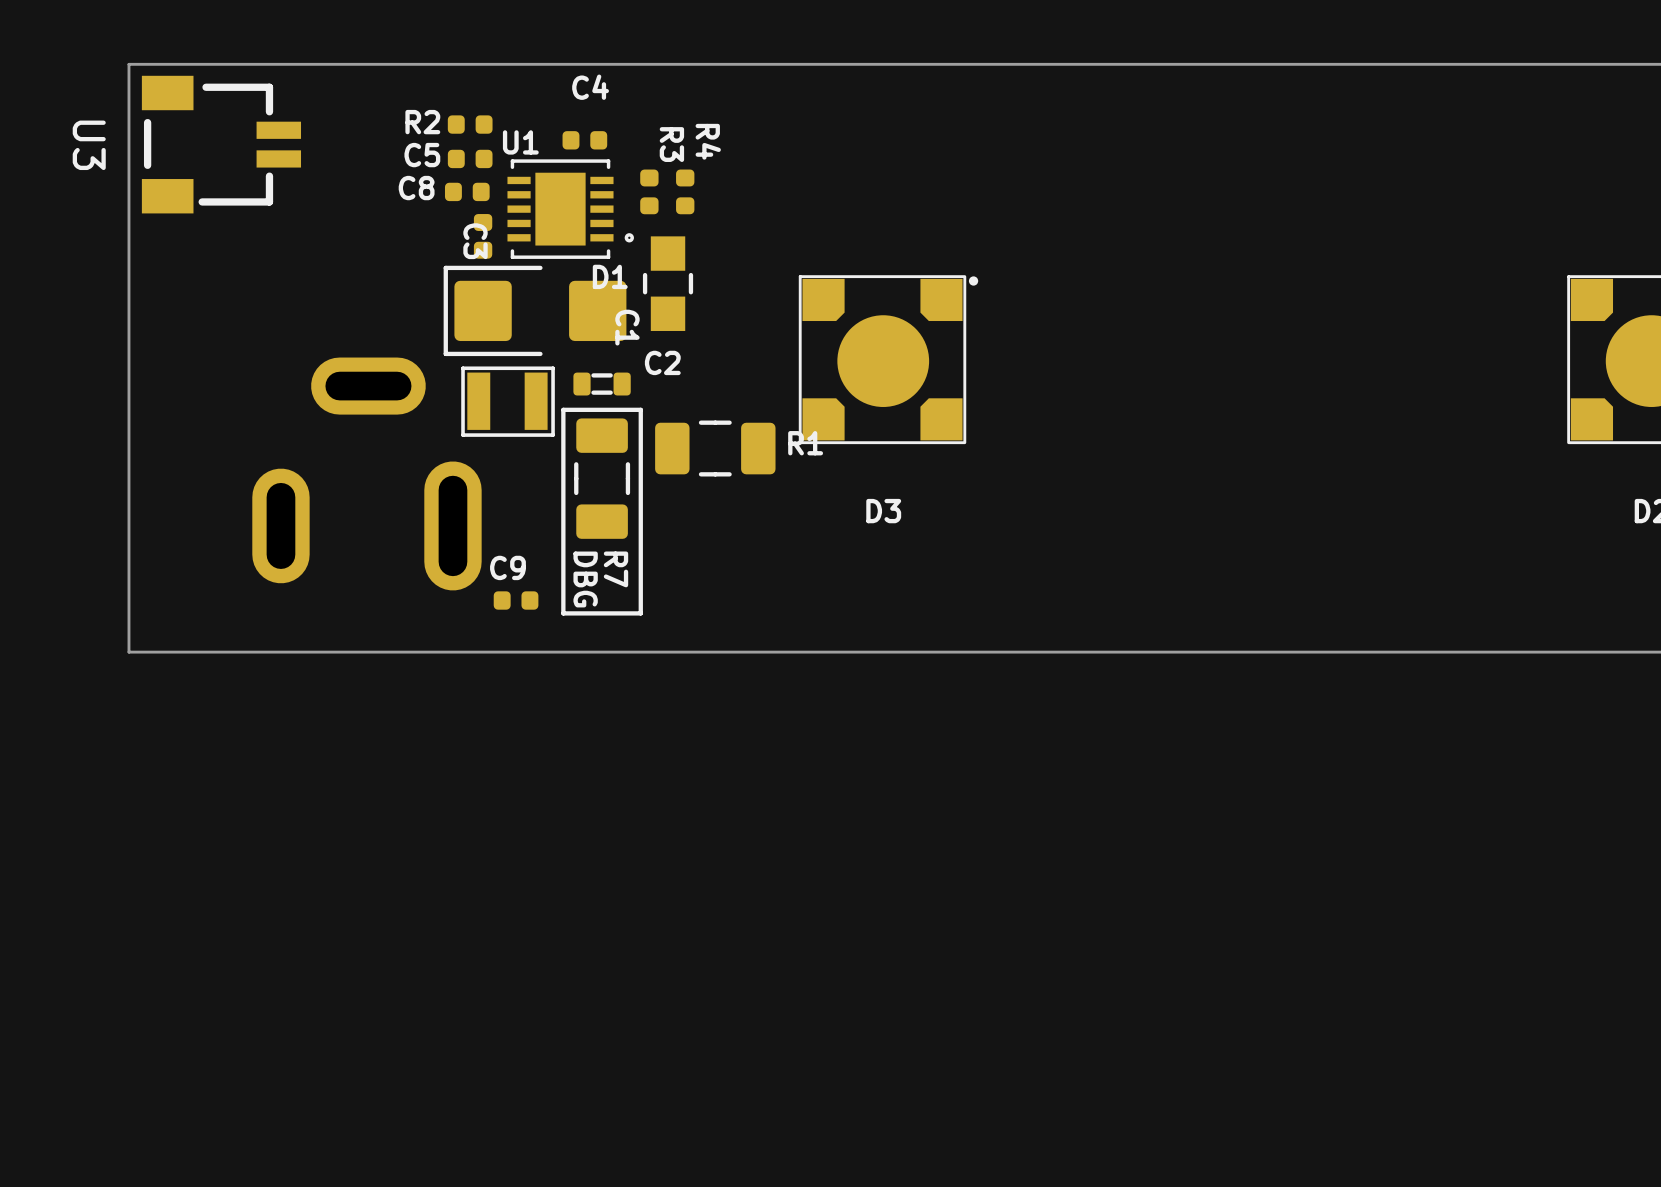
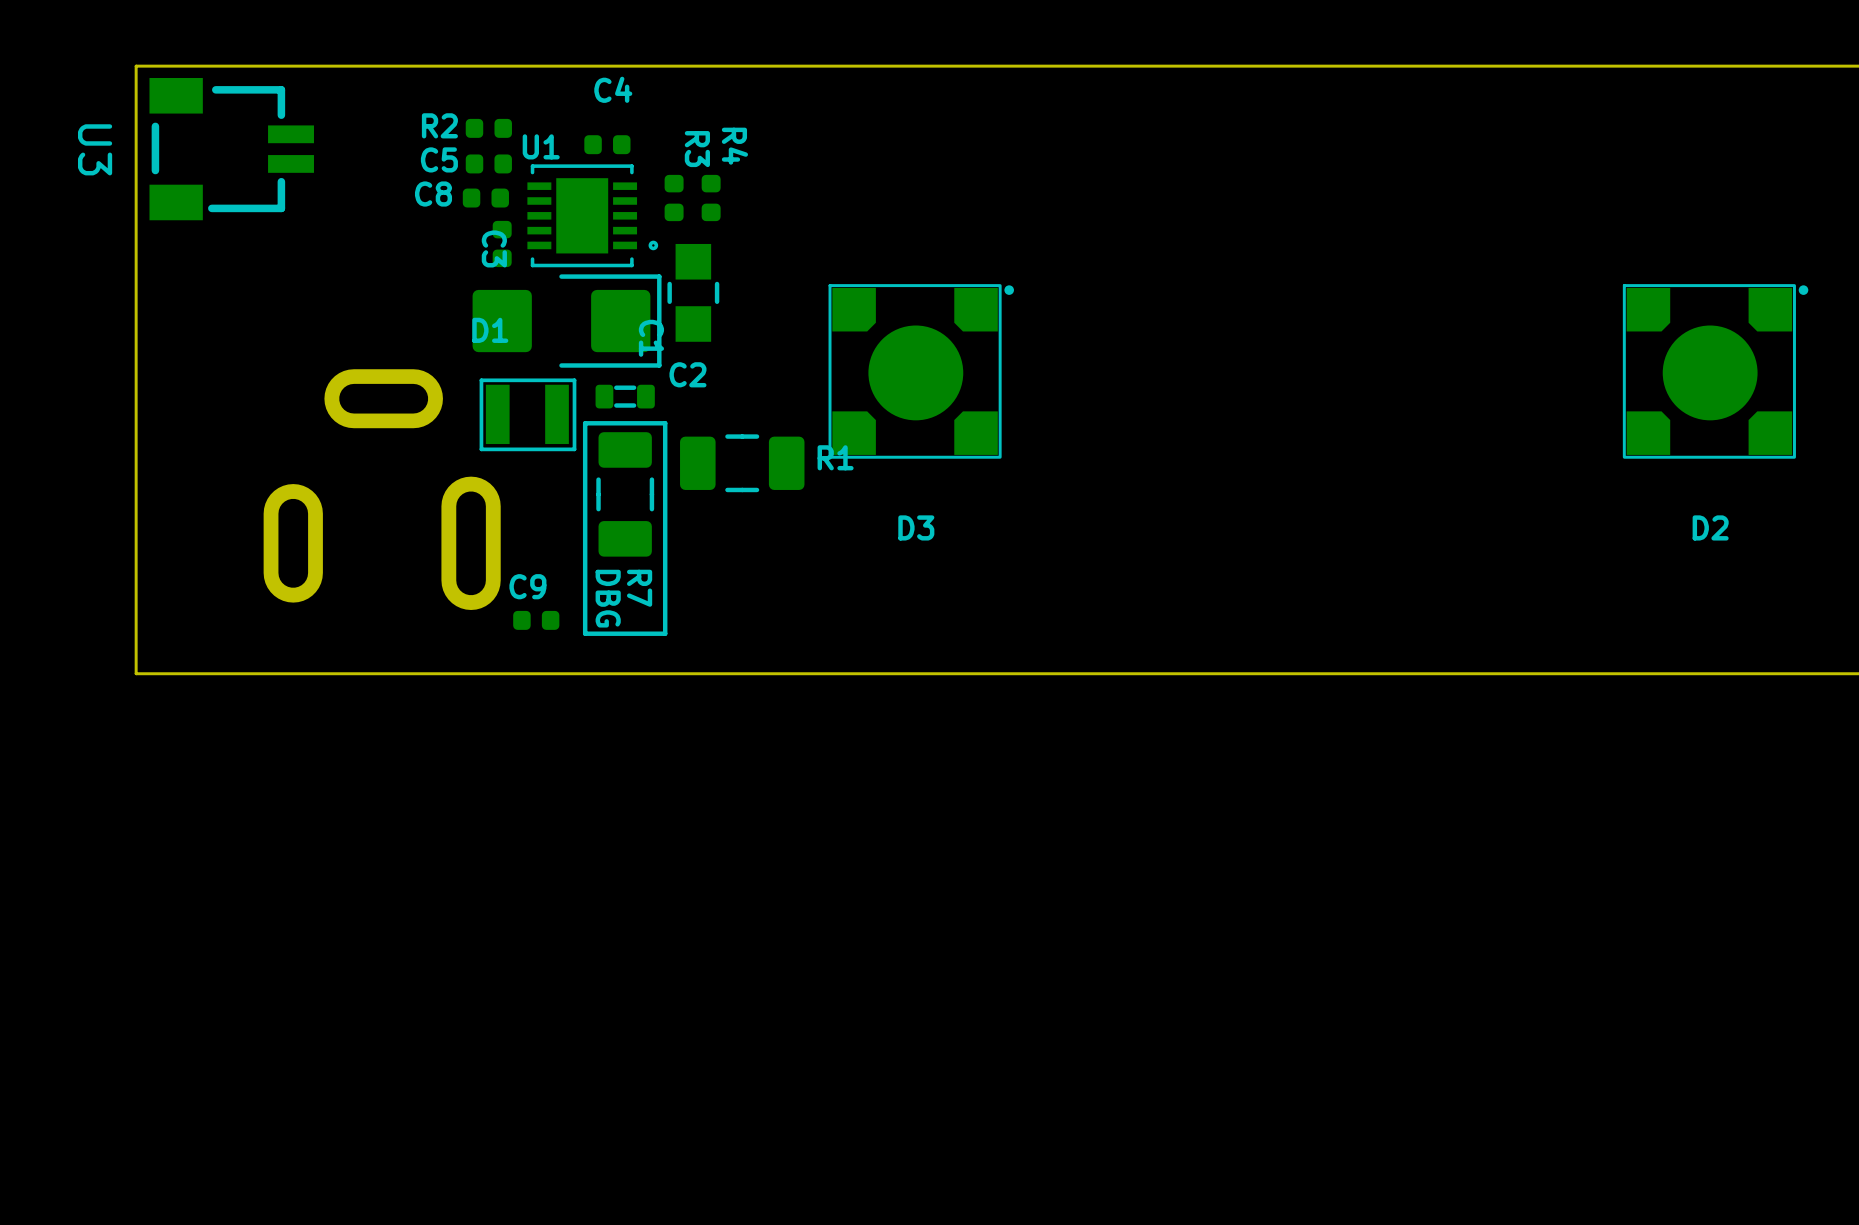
D1 rotation: 0° (535, 310) -> 180° (567, 321)

